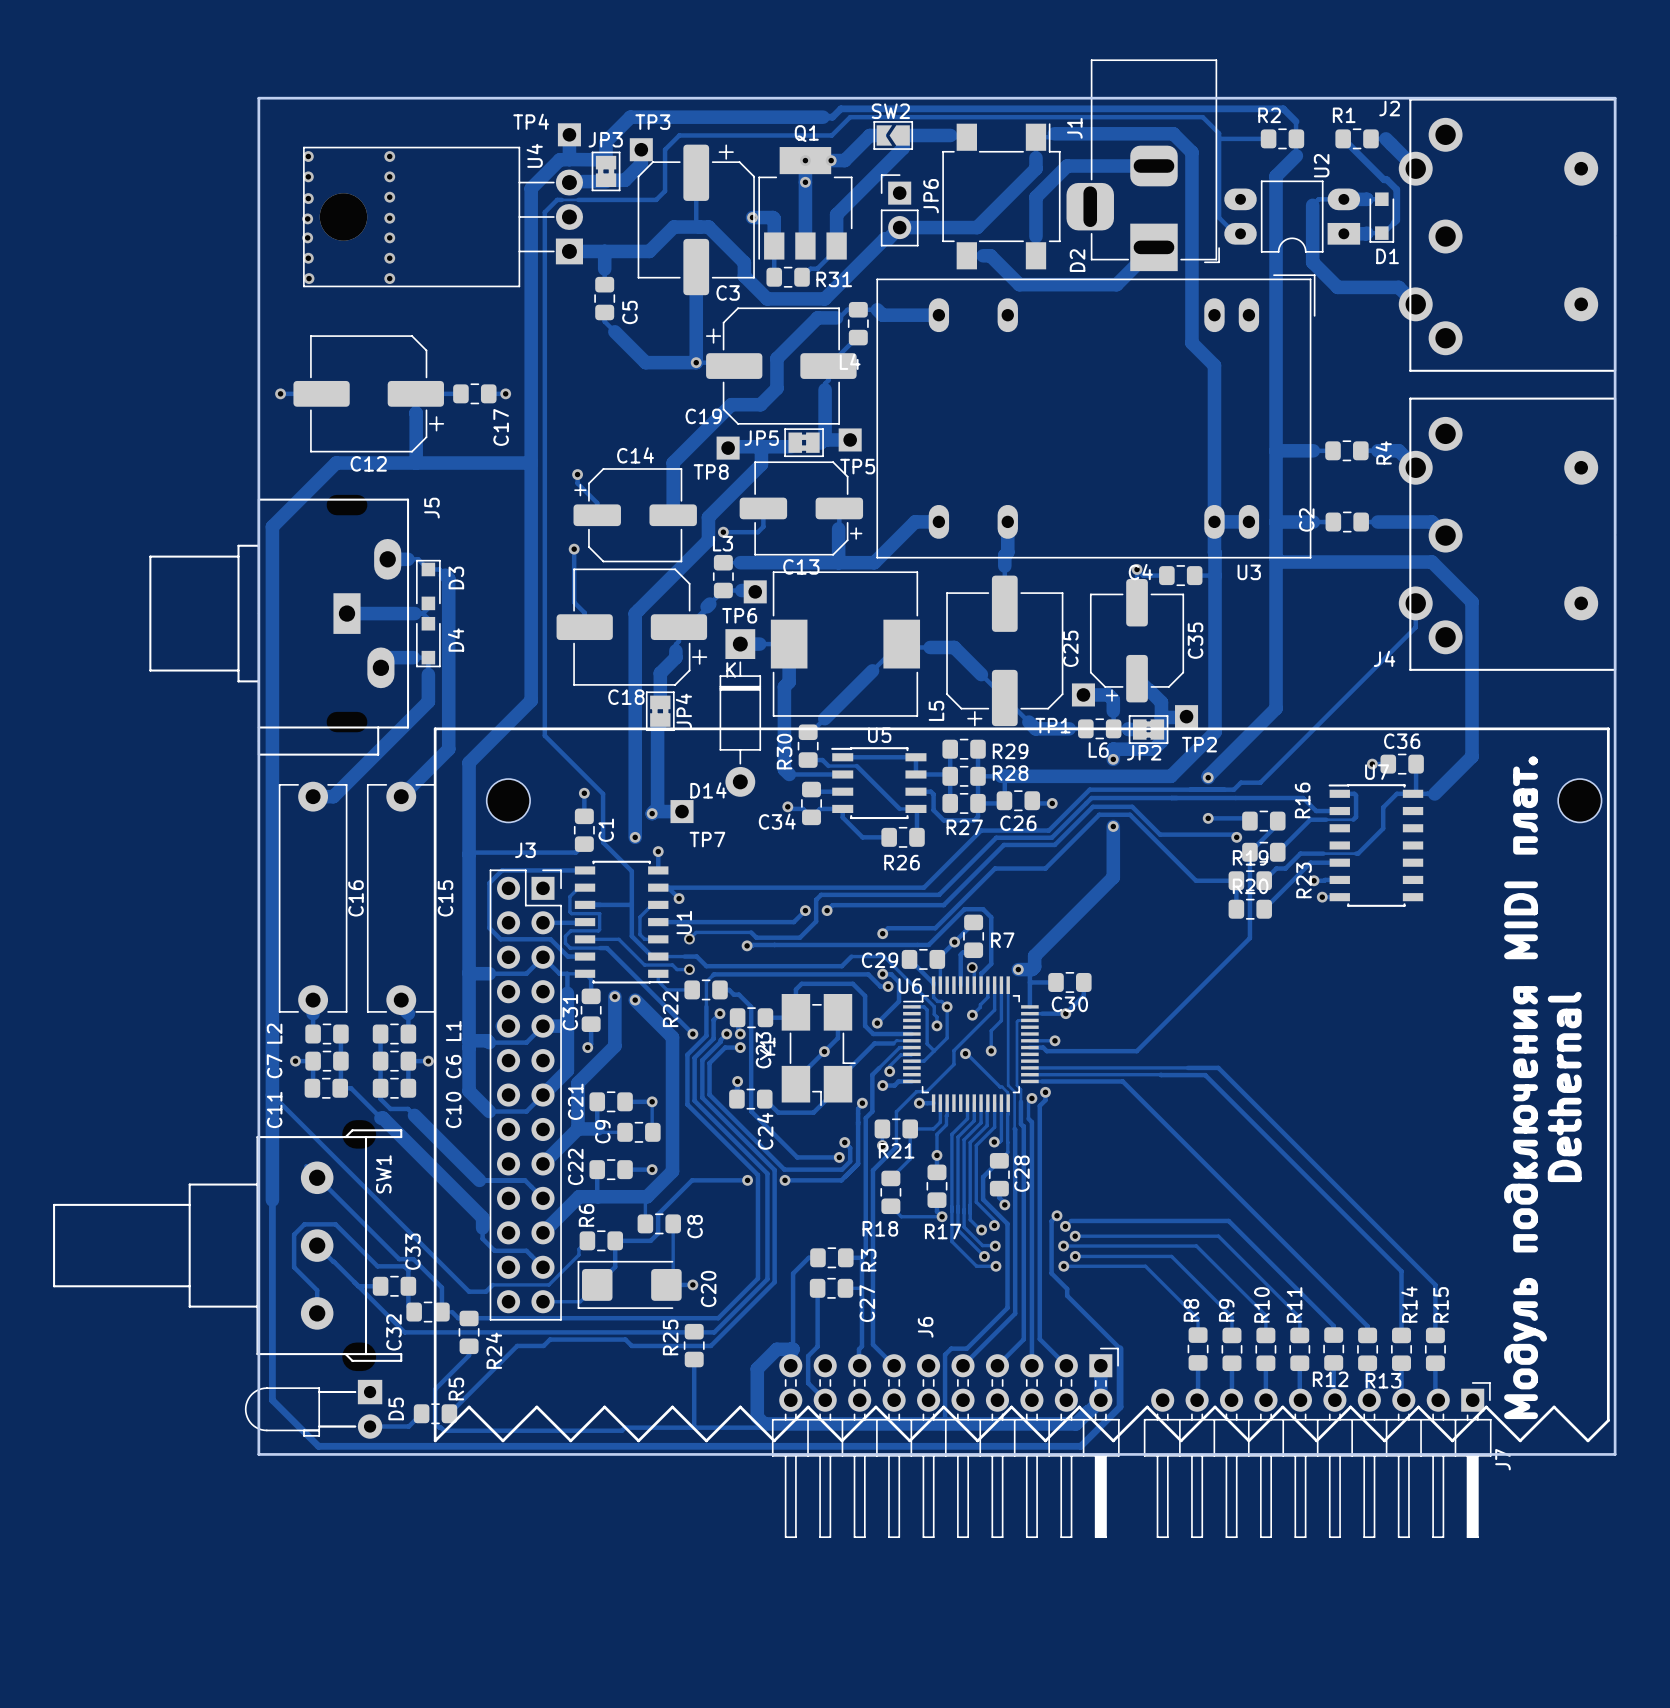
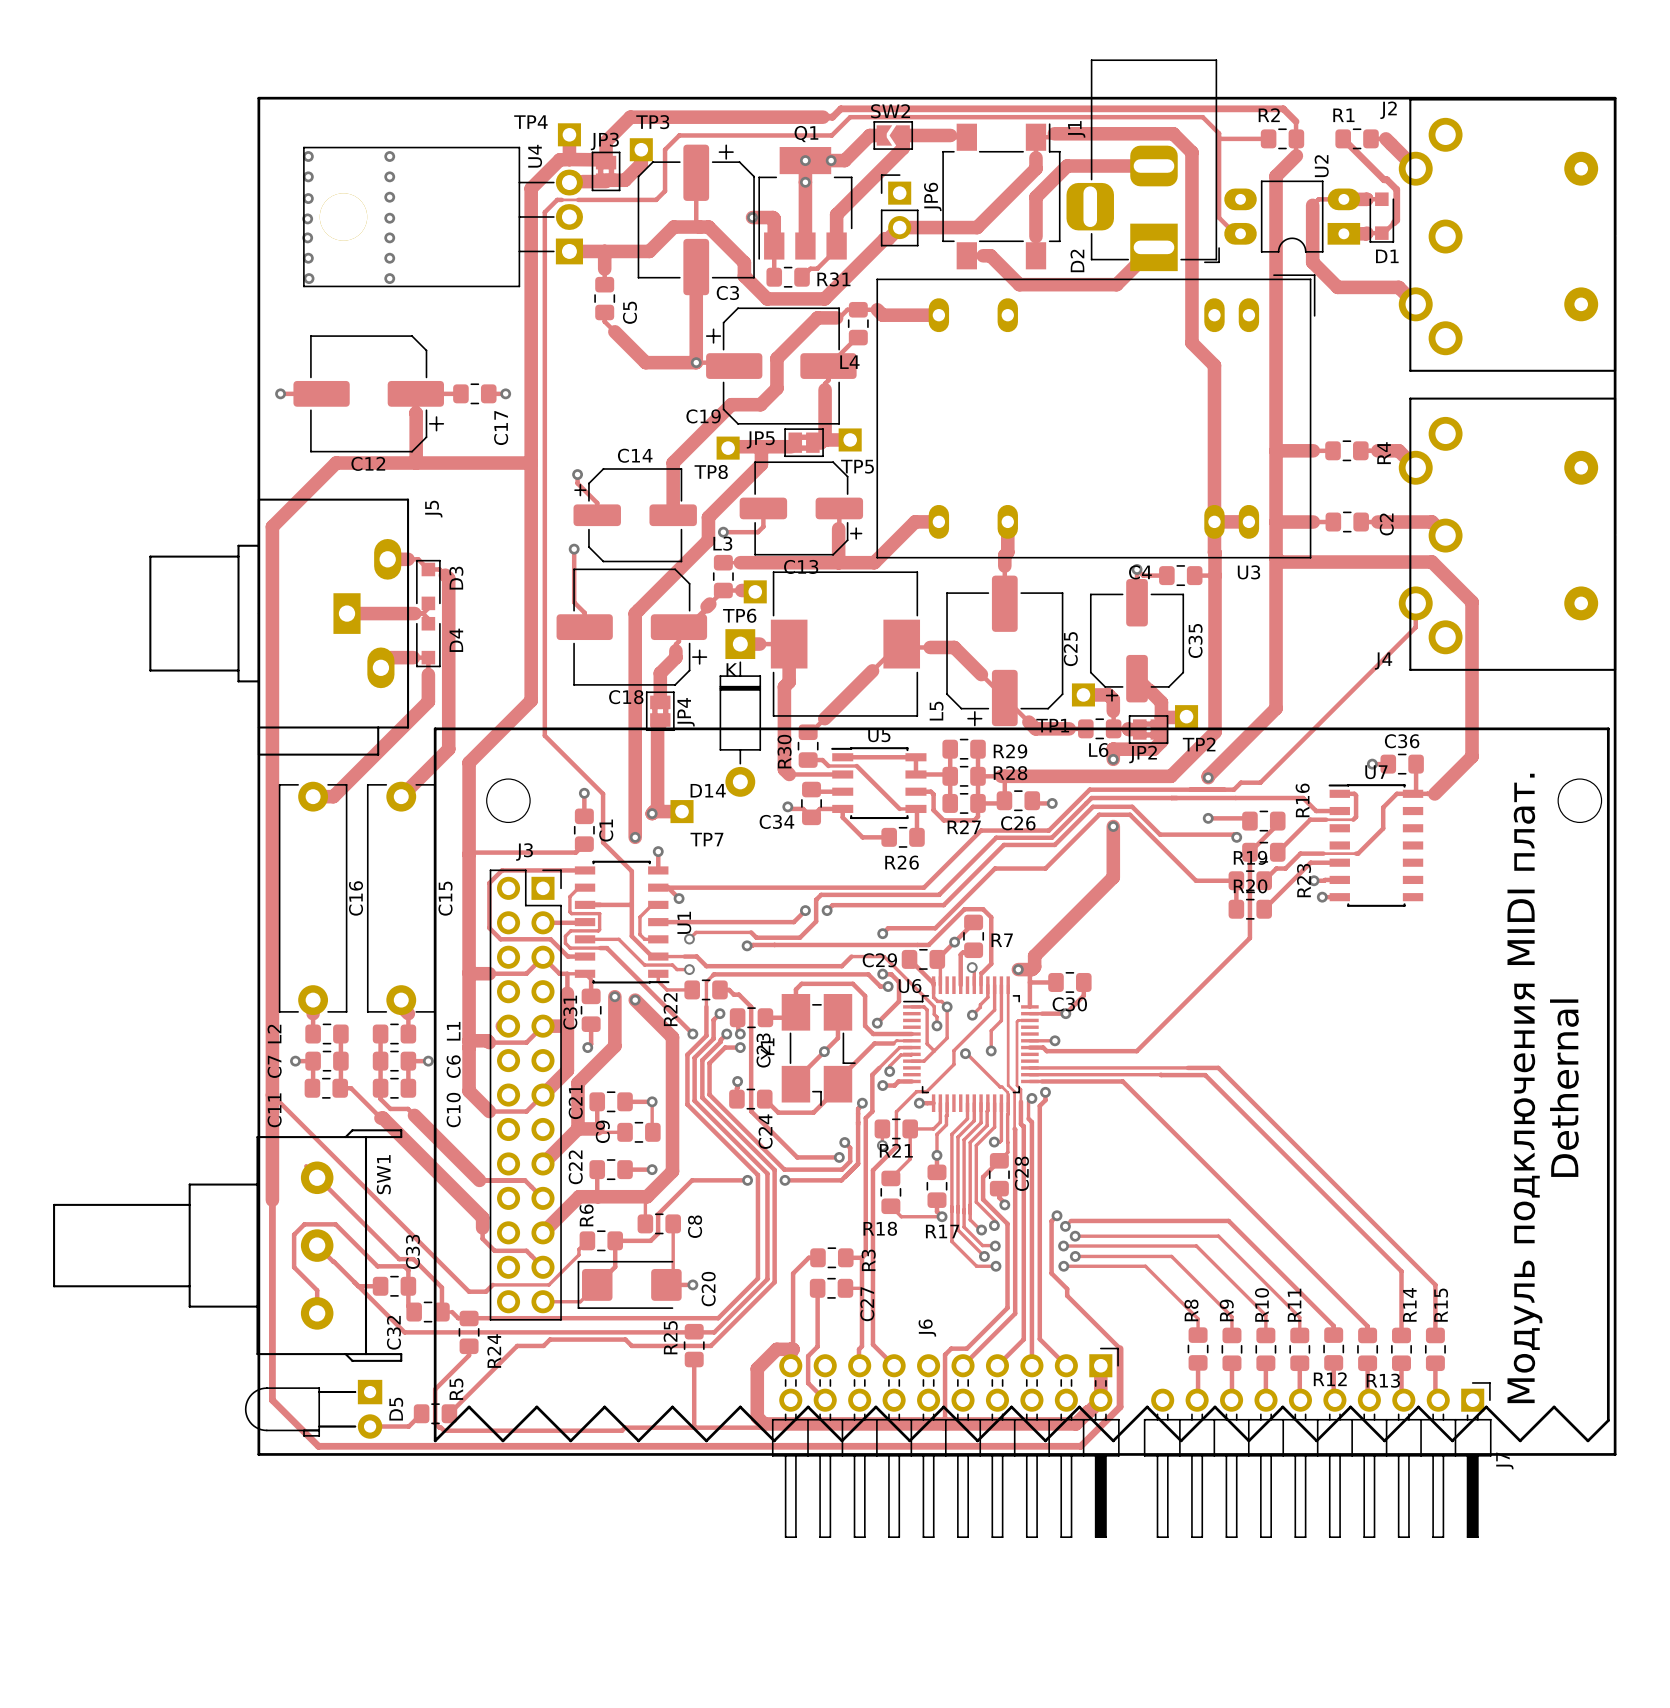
C2 name position: C2 (1306, 519) -> C2 (1386, 524)

